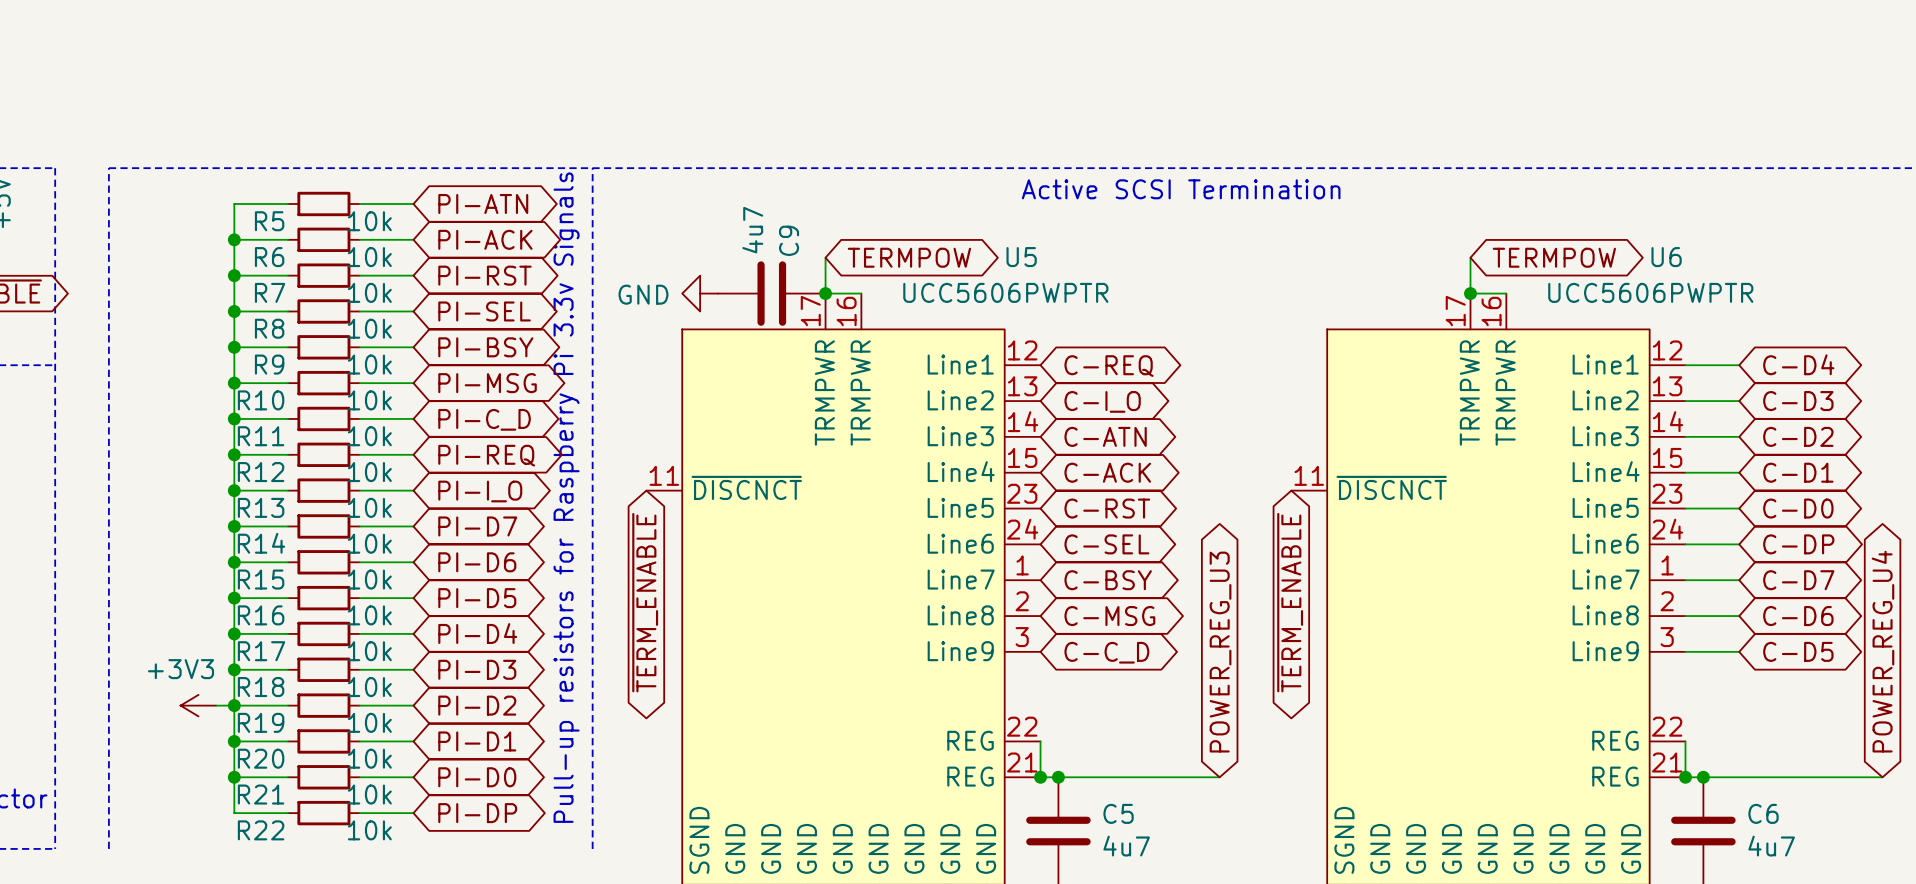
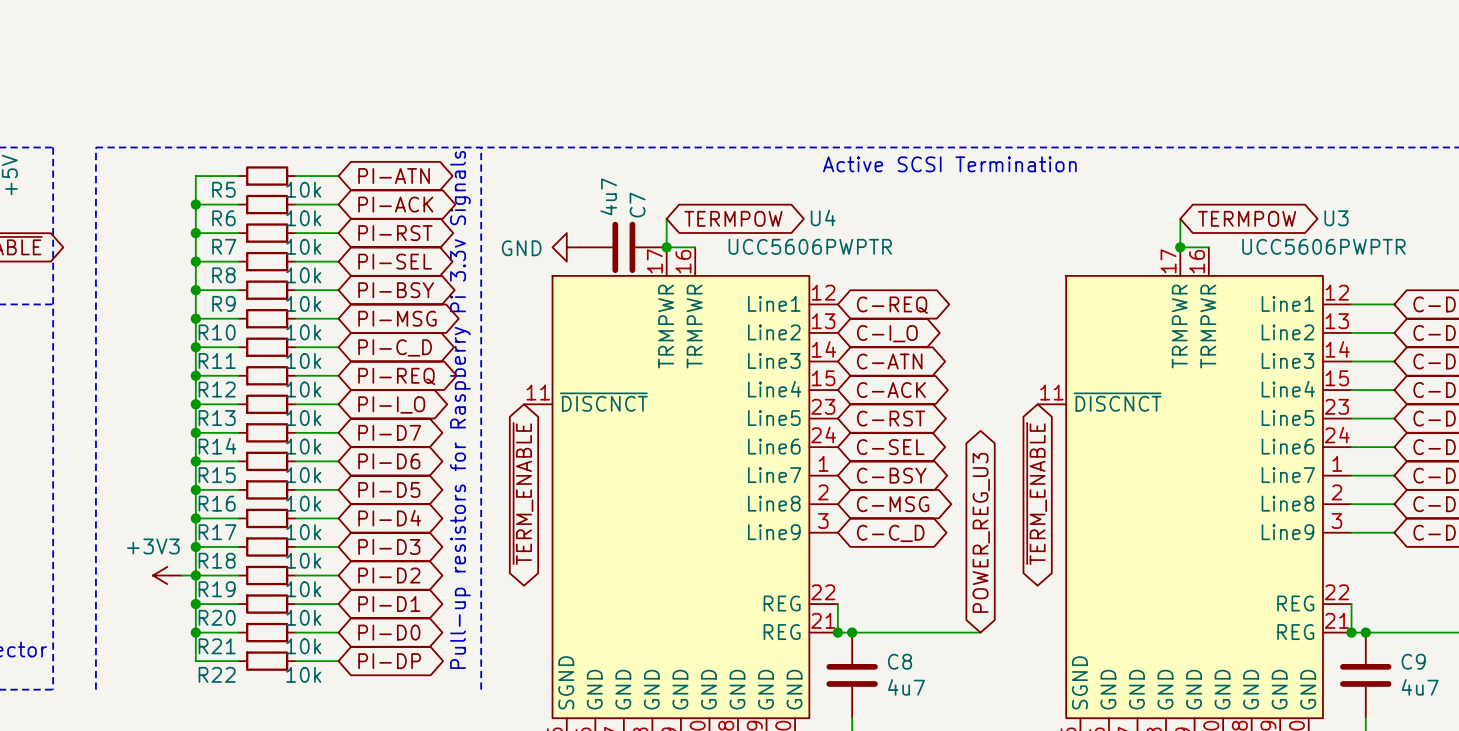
C9 name: C9 (789, 240) -> C7 (637, 205)
U5 name: U5 (1021, 257) -> U4 (823, 217)
U6 name: U6 (1666, 257) -> U3 (1336, 218)
C5 name: C5 (1118, 813) -> C8 (900, 661)
C6 name: C6 (1763, 813) -> C9 (1413, 661)

